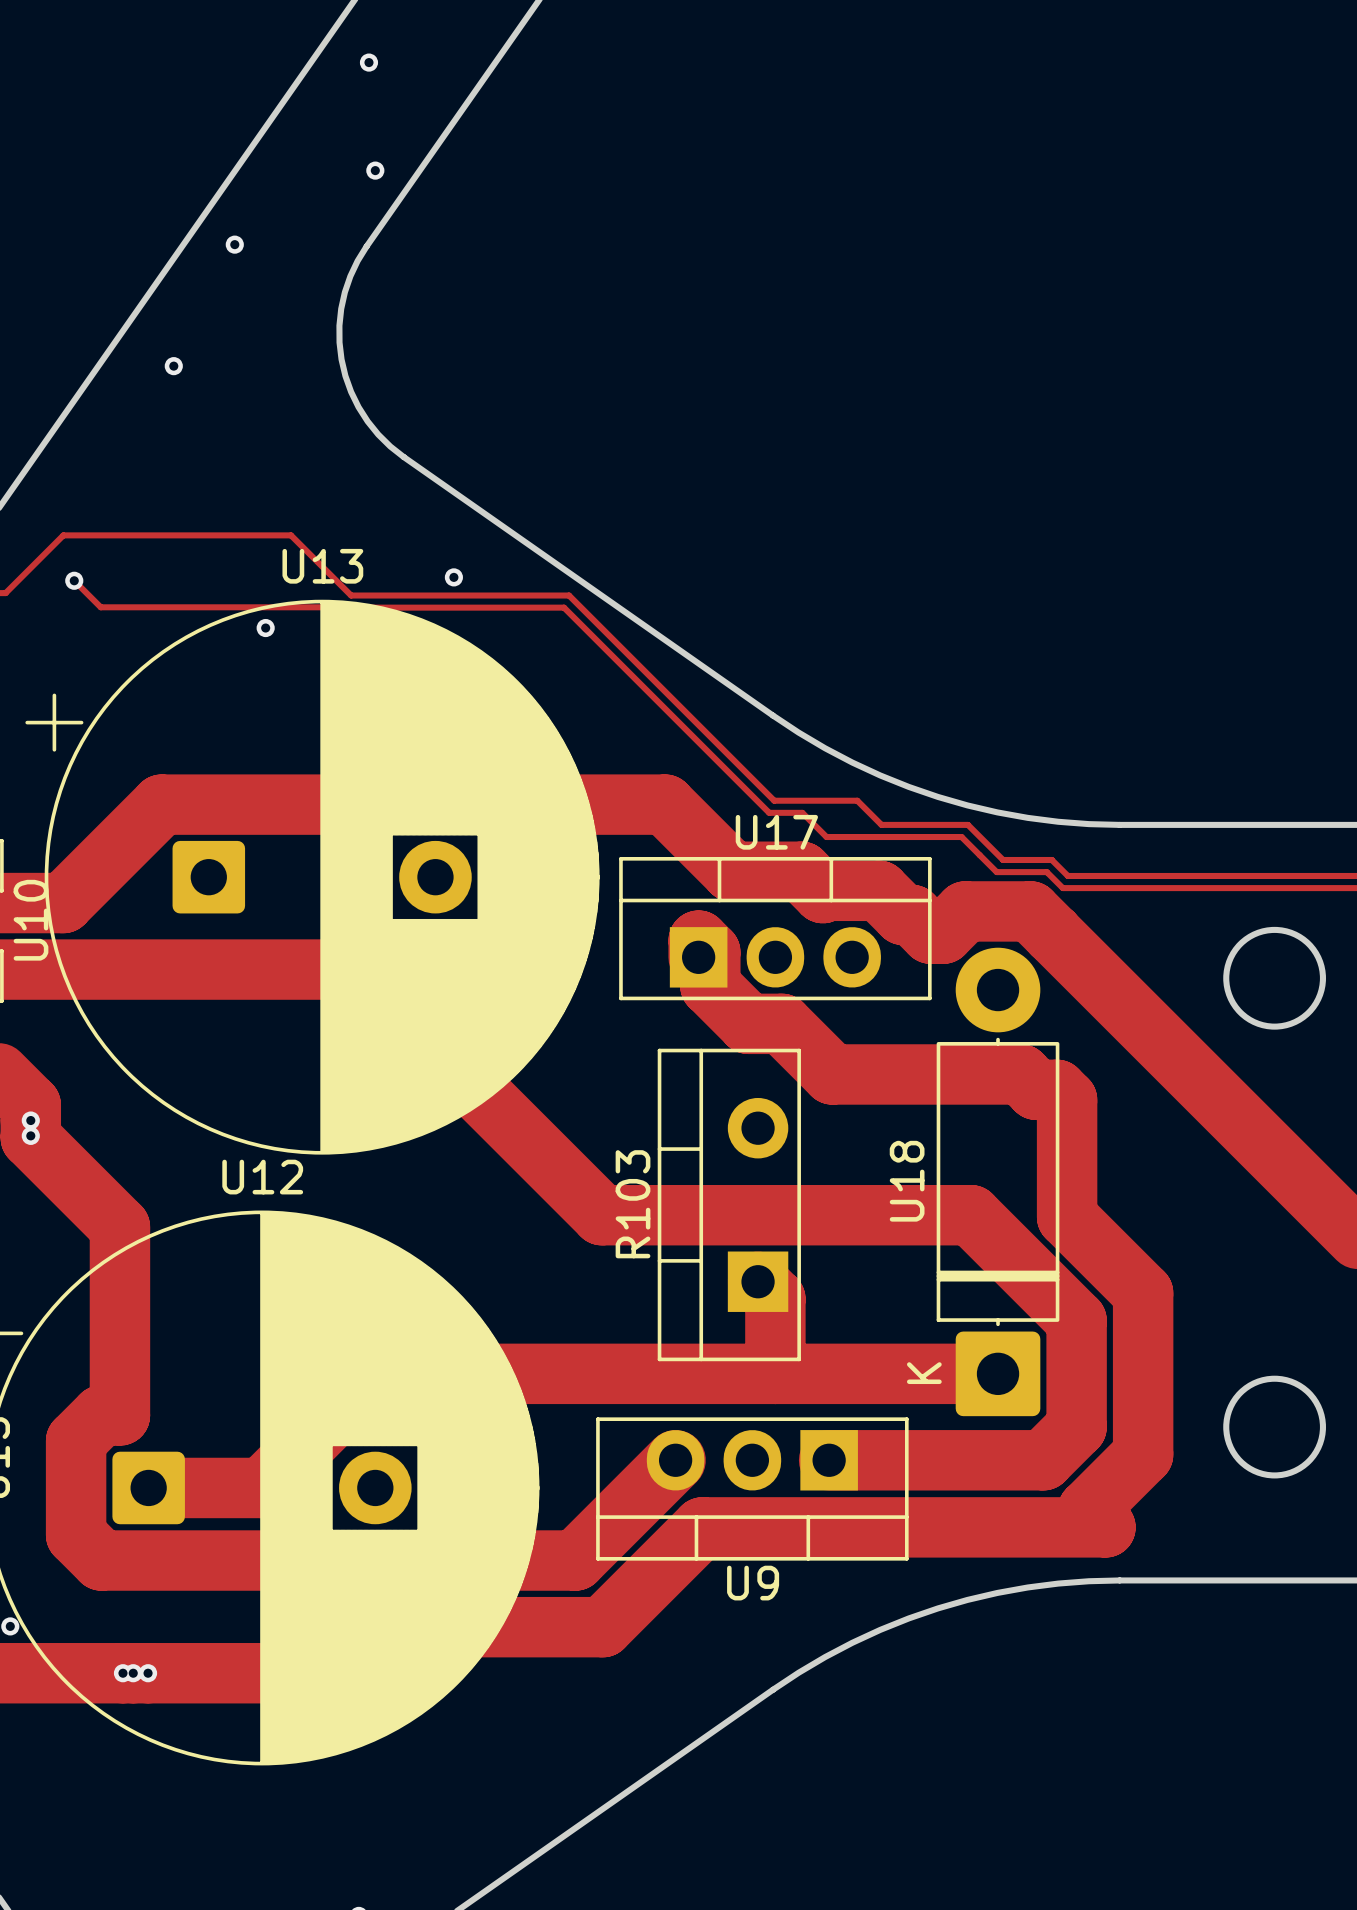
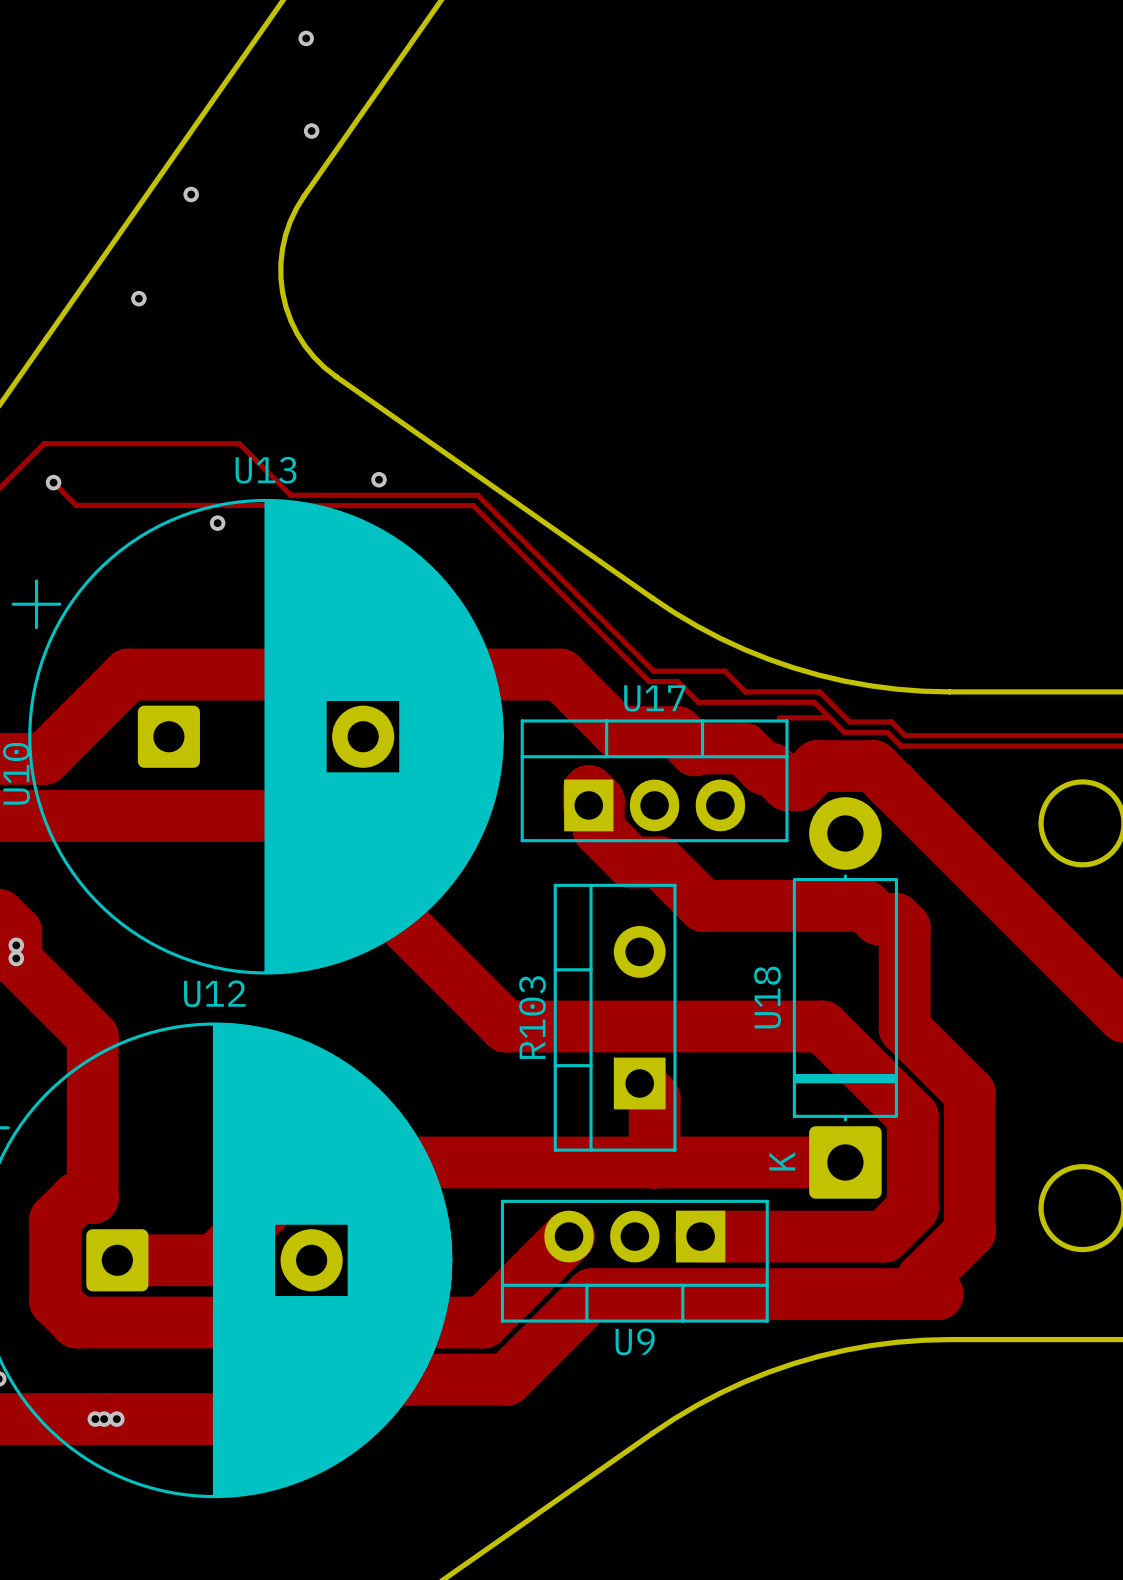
track: none -> (779, 717) (829, 717)

